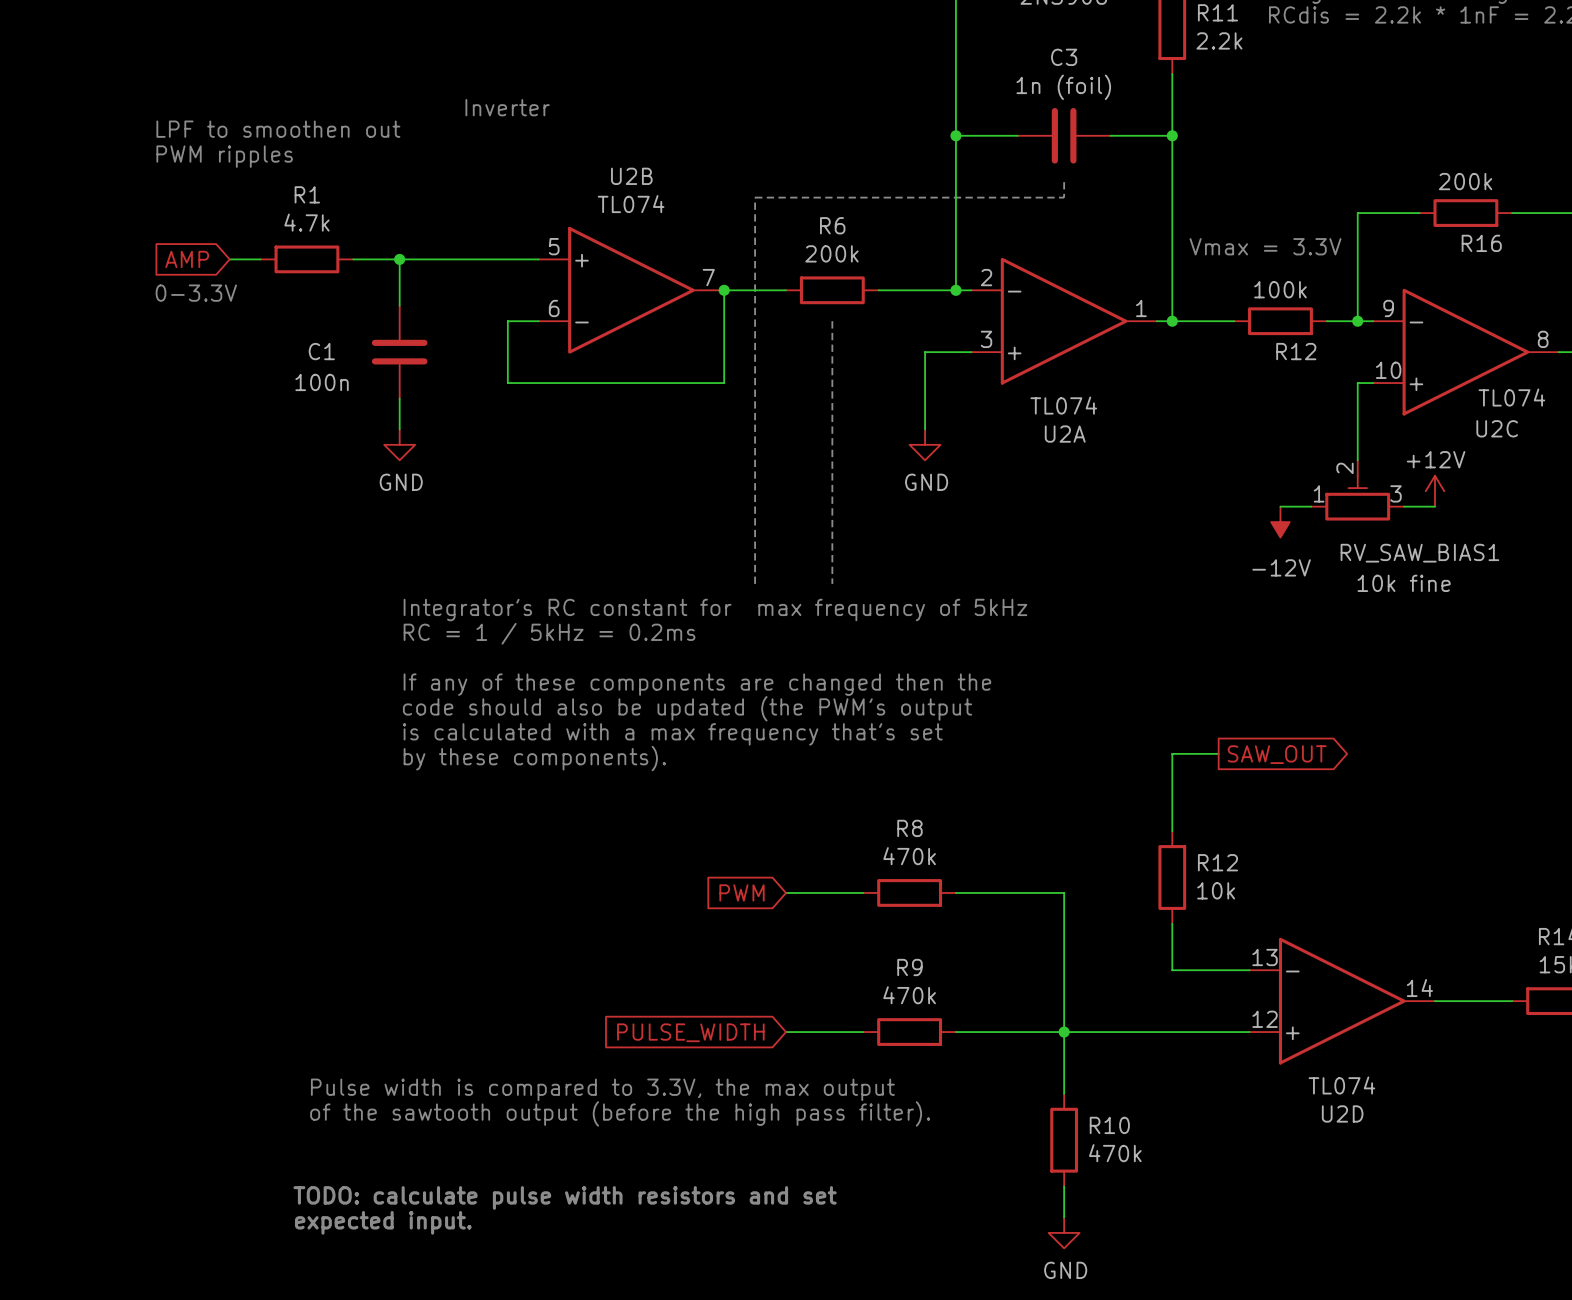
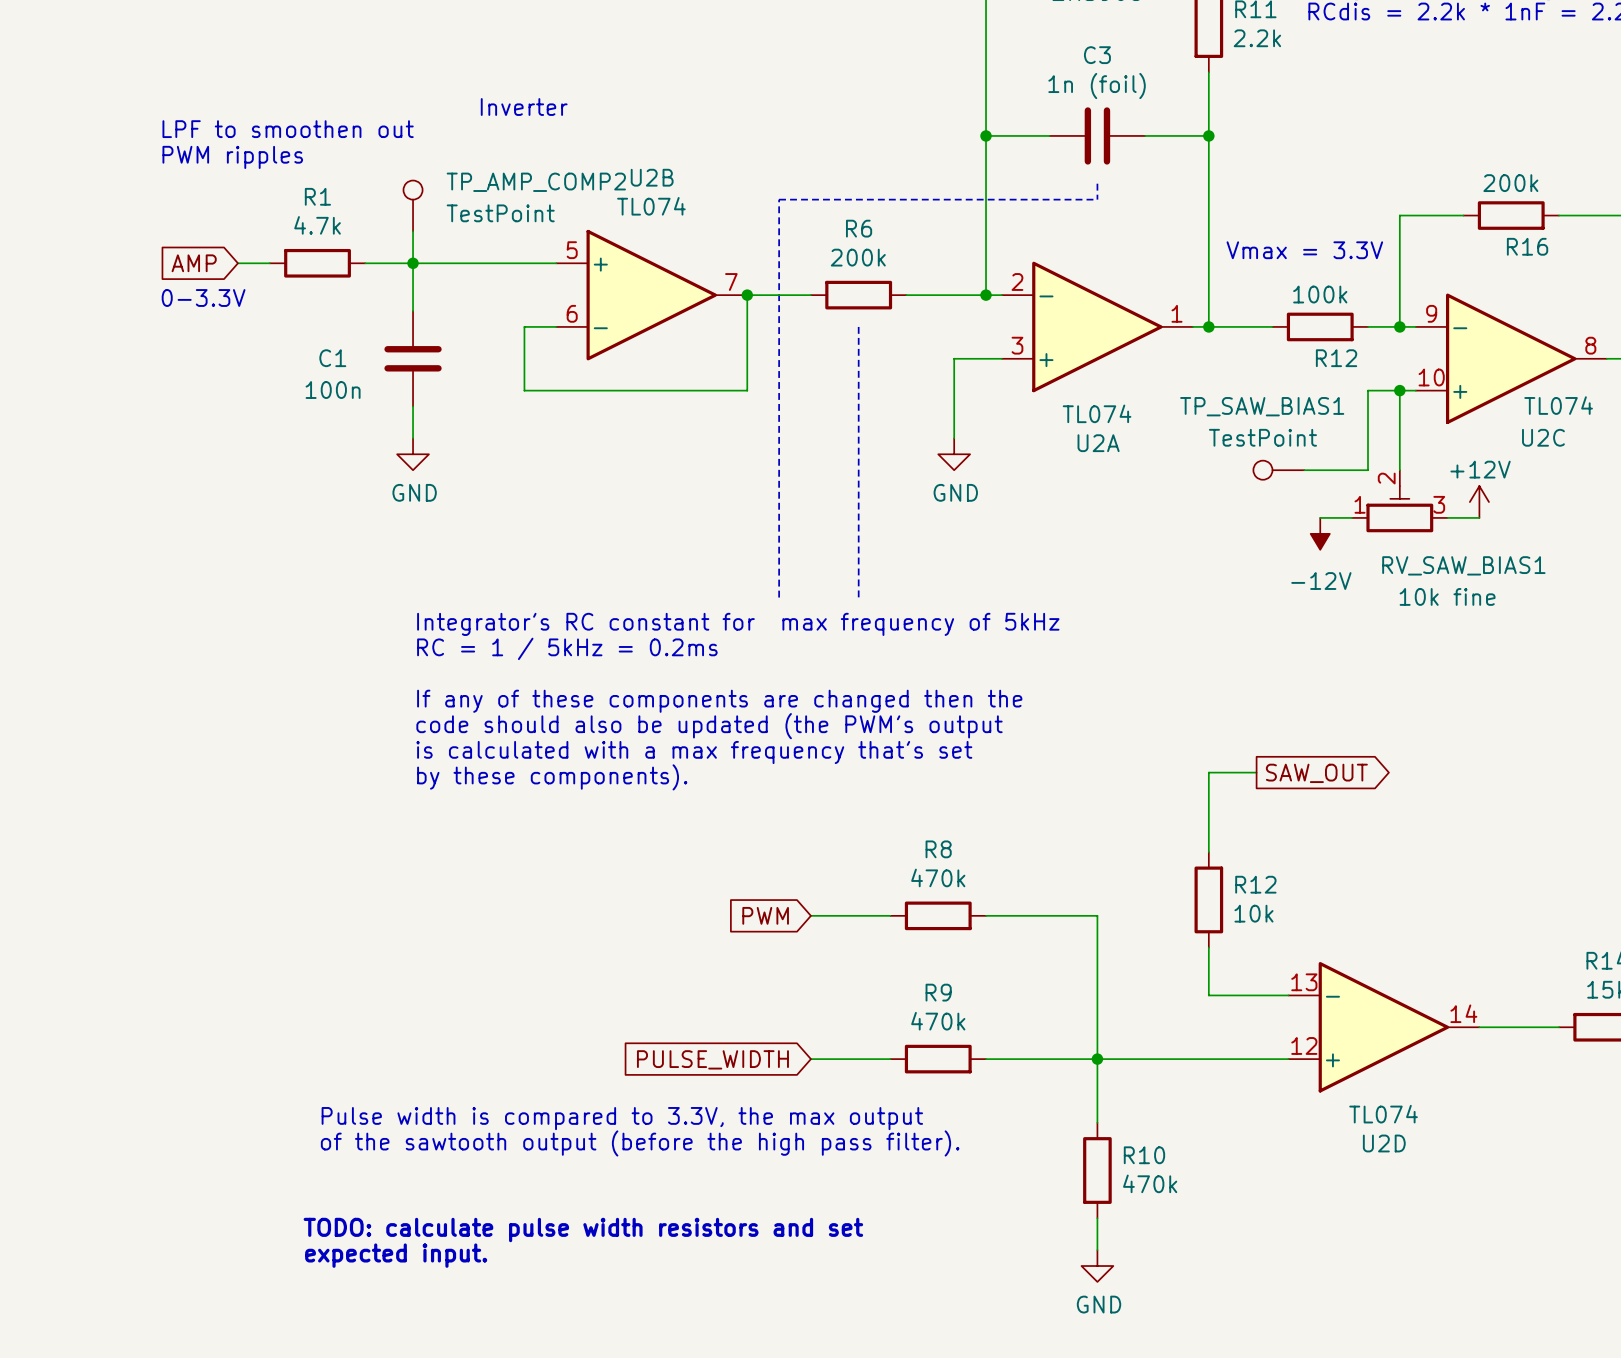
TP_AMP_COMP2: none -> TestPoint (413, 205)
wire: none -> (413, 231) (413, 263)
wire: none -> (1399, 390) (1368, 390) (1368, 470) (1304, 470)
junction: none -> (1399, 390)
TP_SAW_BIAS1: none -> TestPoint (1278, 470)

